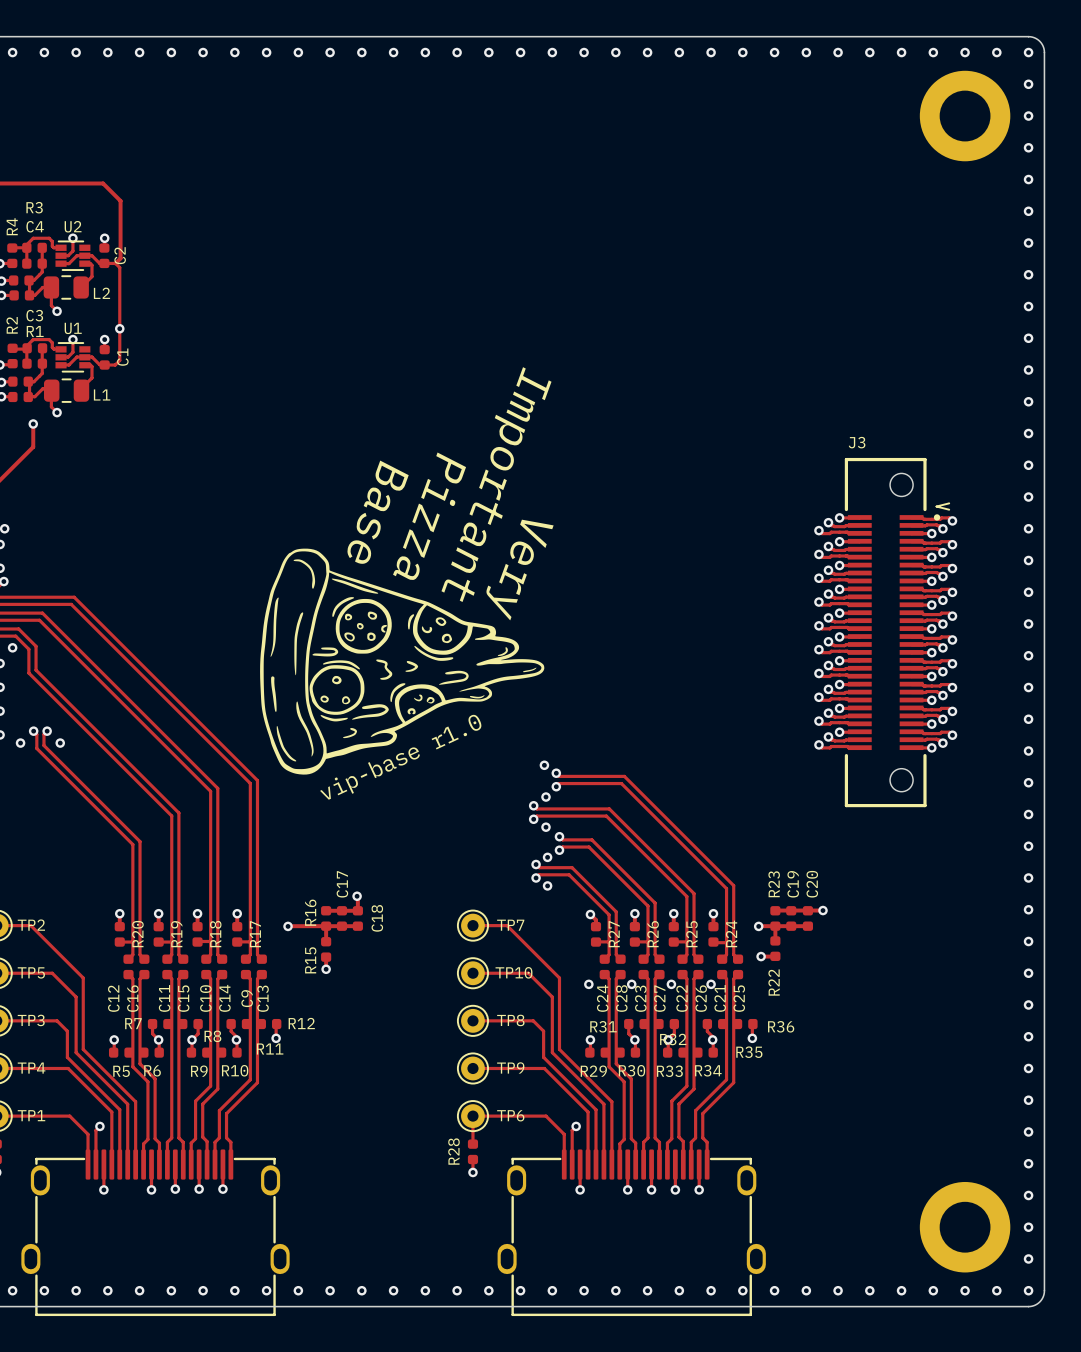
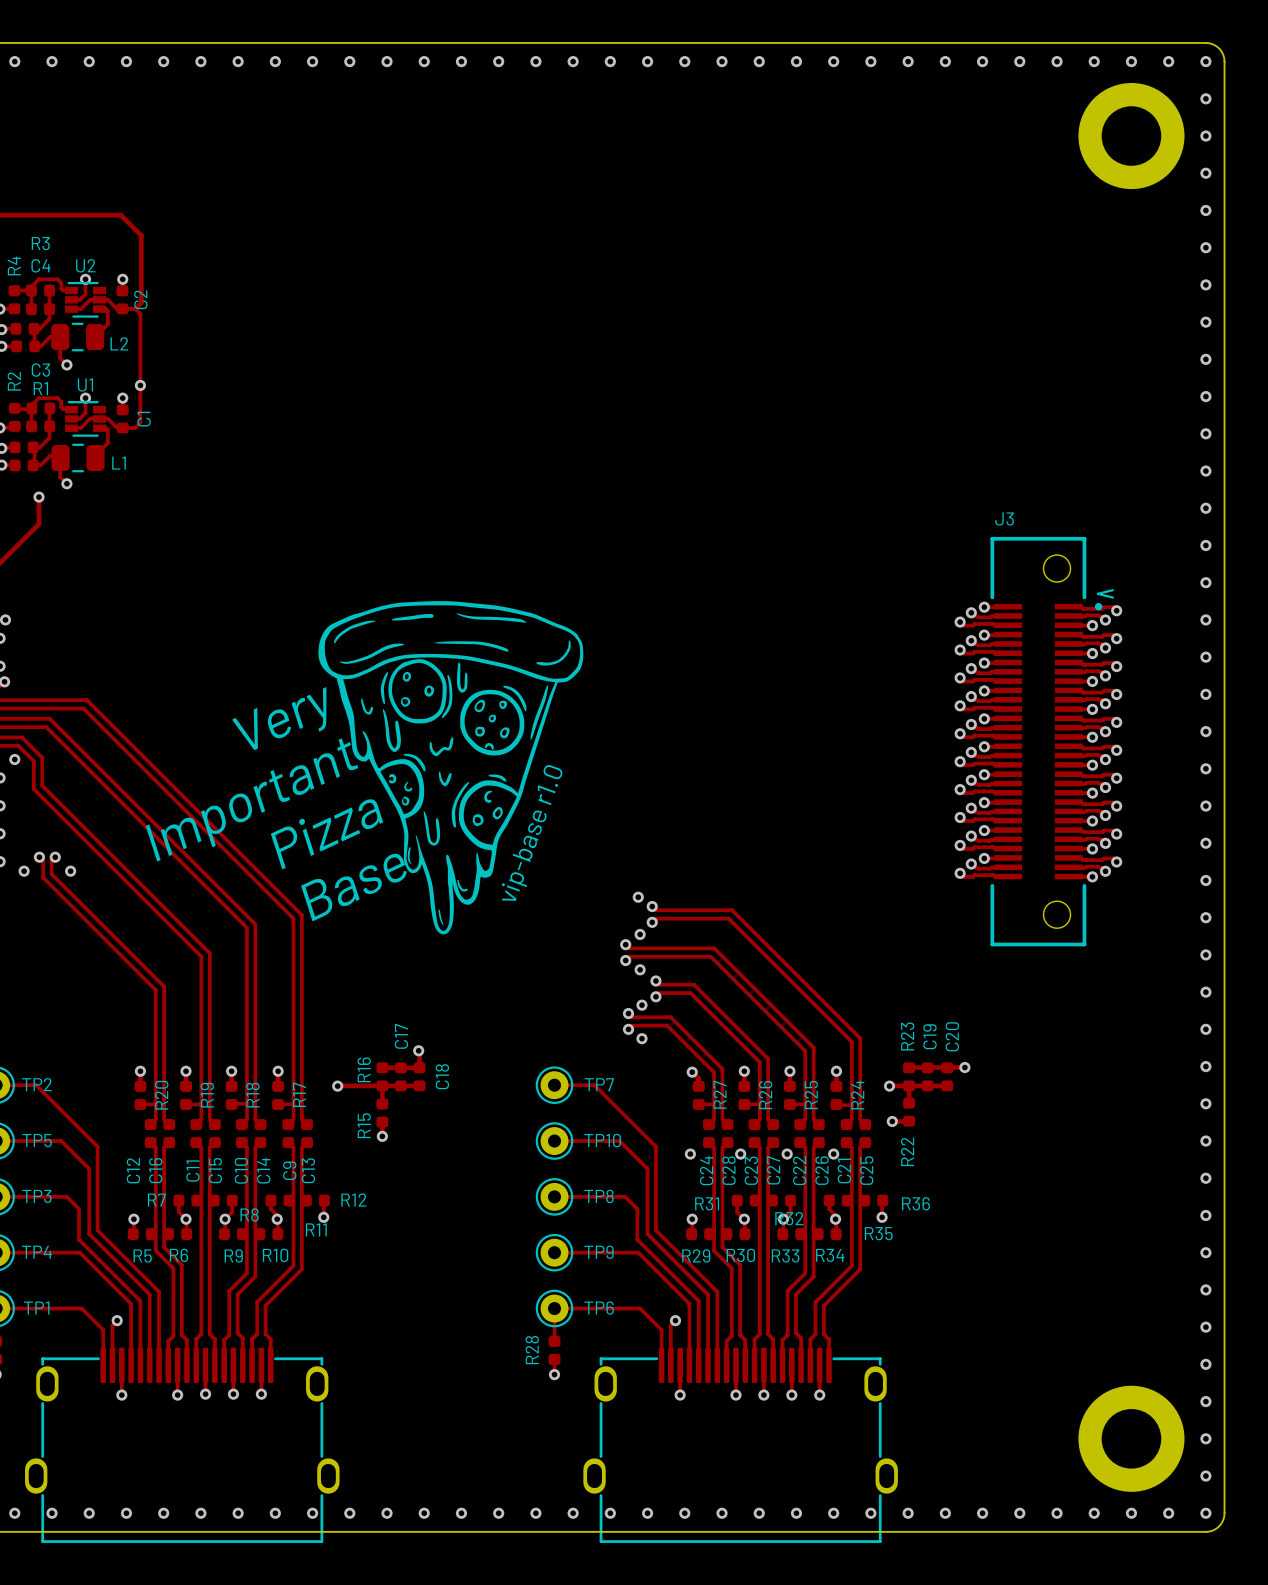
text rotation: 0° (496, 484) -> 135° counterclockwise (252, 799)
text position: Important (496, 484) -> Important (252, 799)
drawing: none -> [318, 601, 584, 935]
text rotation: 0° (377, 512) -> 135° counterclockwise (353, 887)
text position: Base (377, 512) -> Base (353, 887)
text rotation: 0° (429, 516) -> 135° counterclockwise (327, 833)
text position: Pizza (429, 516) -> Pizza (327, 833)
drawing: [260, 548, 545, 775] -> none
text rotation: 0° (520, 570) -> 135° counterclockwise (279, 718)
text position: Very (520, 570) -> Very (279, 718)
text rotation: 0° (400, 757) -> 45° counterclockwise (532, 832)

